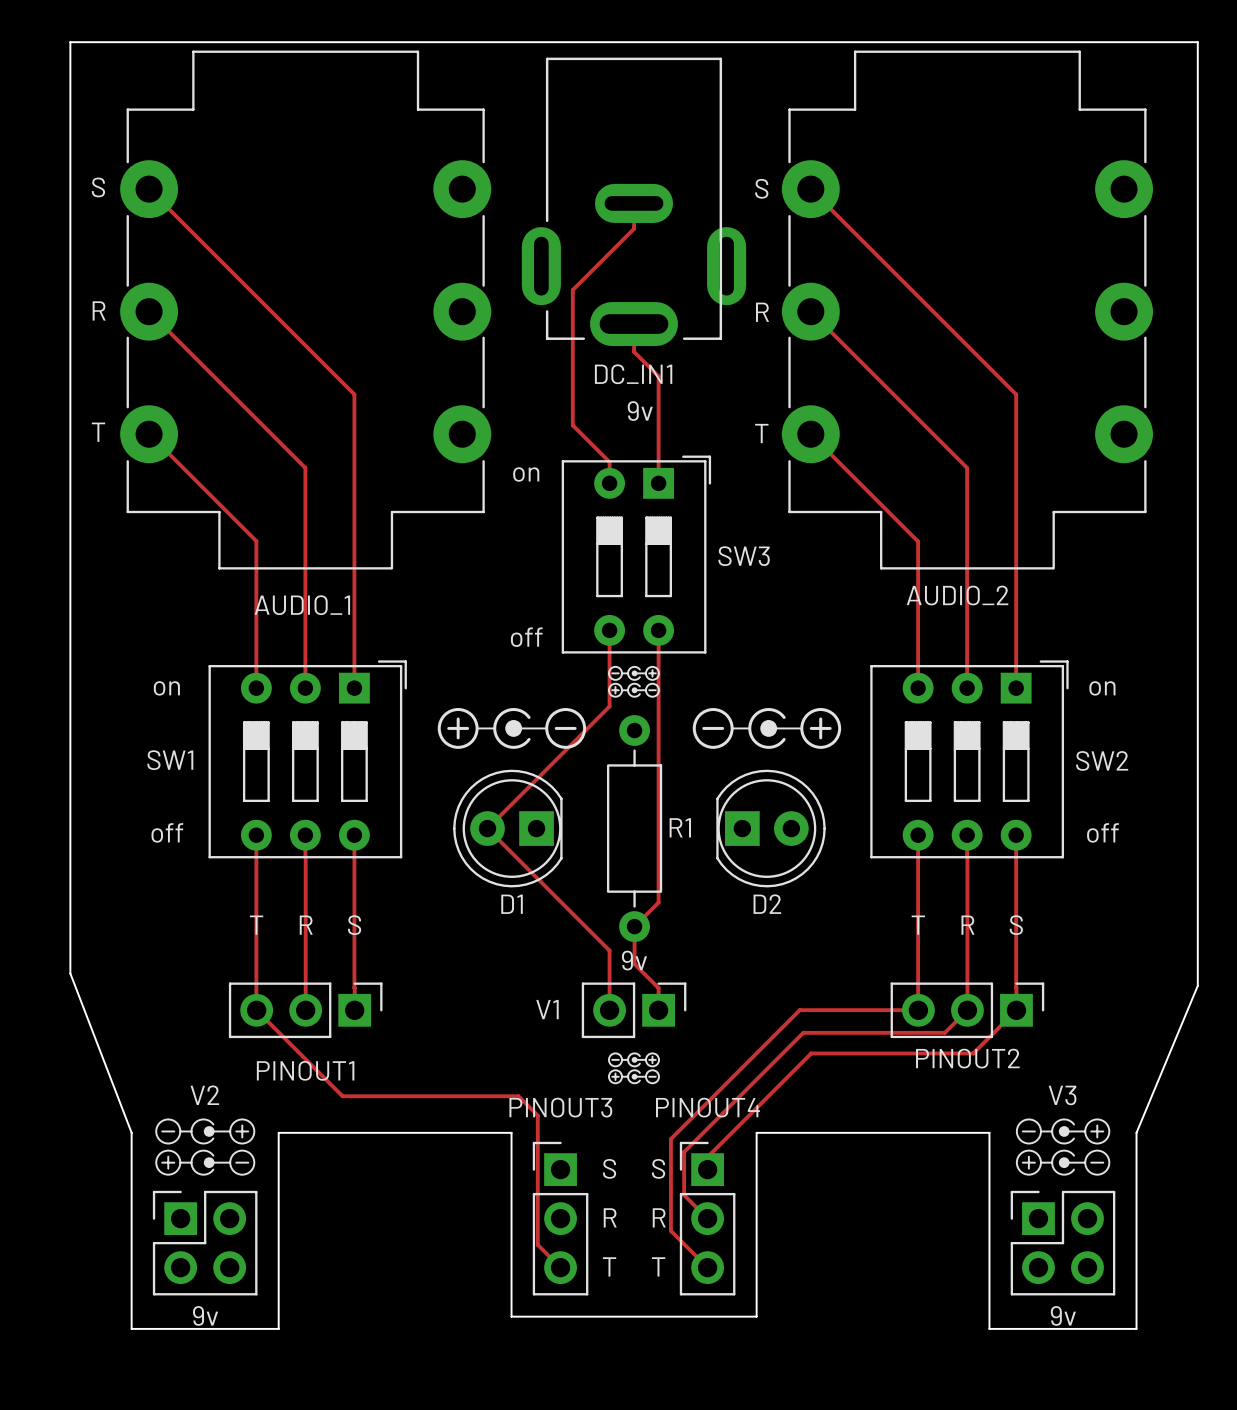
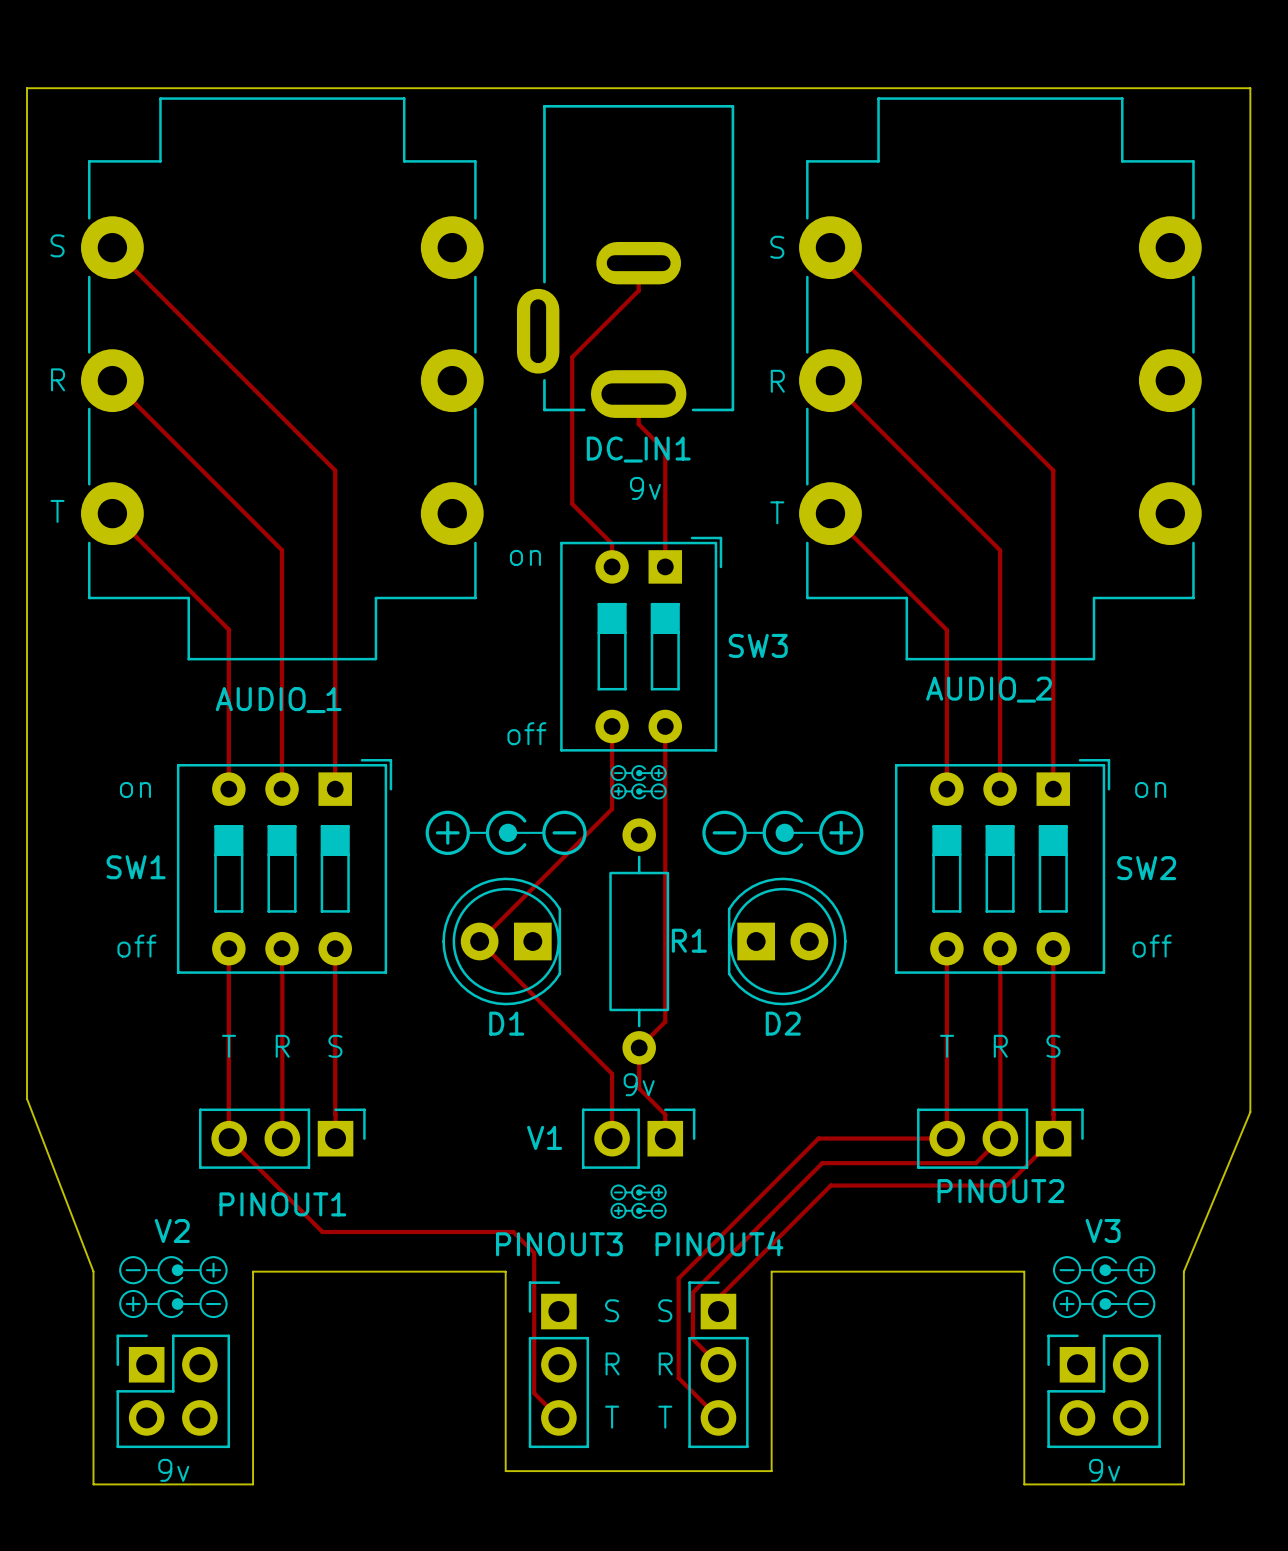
DC_IN1 footprint: [521, 57, 747, 347] -> [516, 104, 735, 418]

